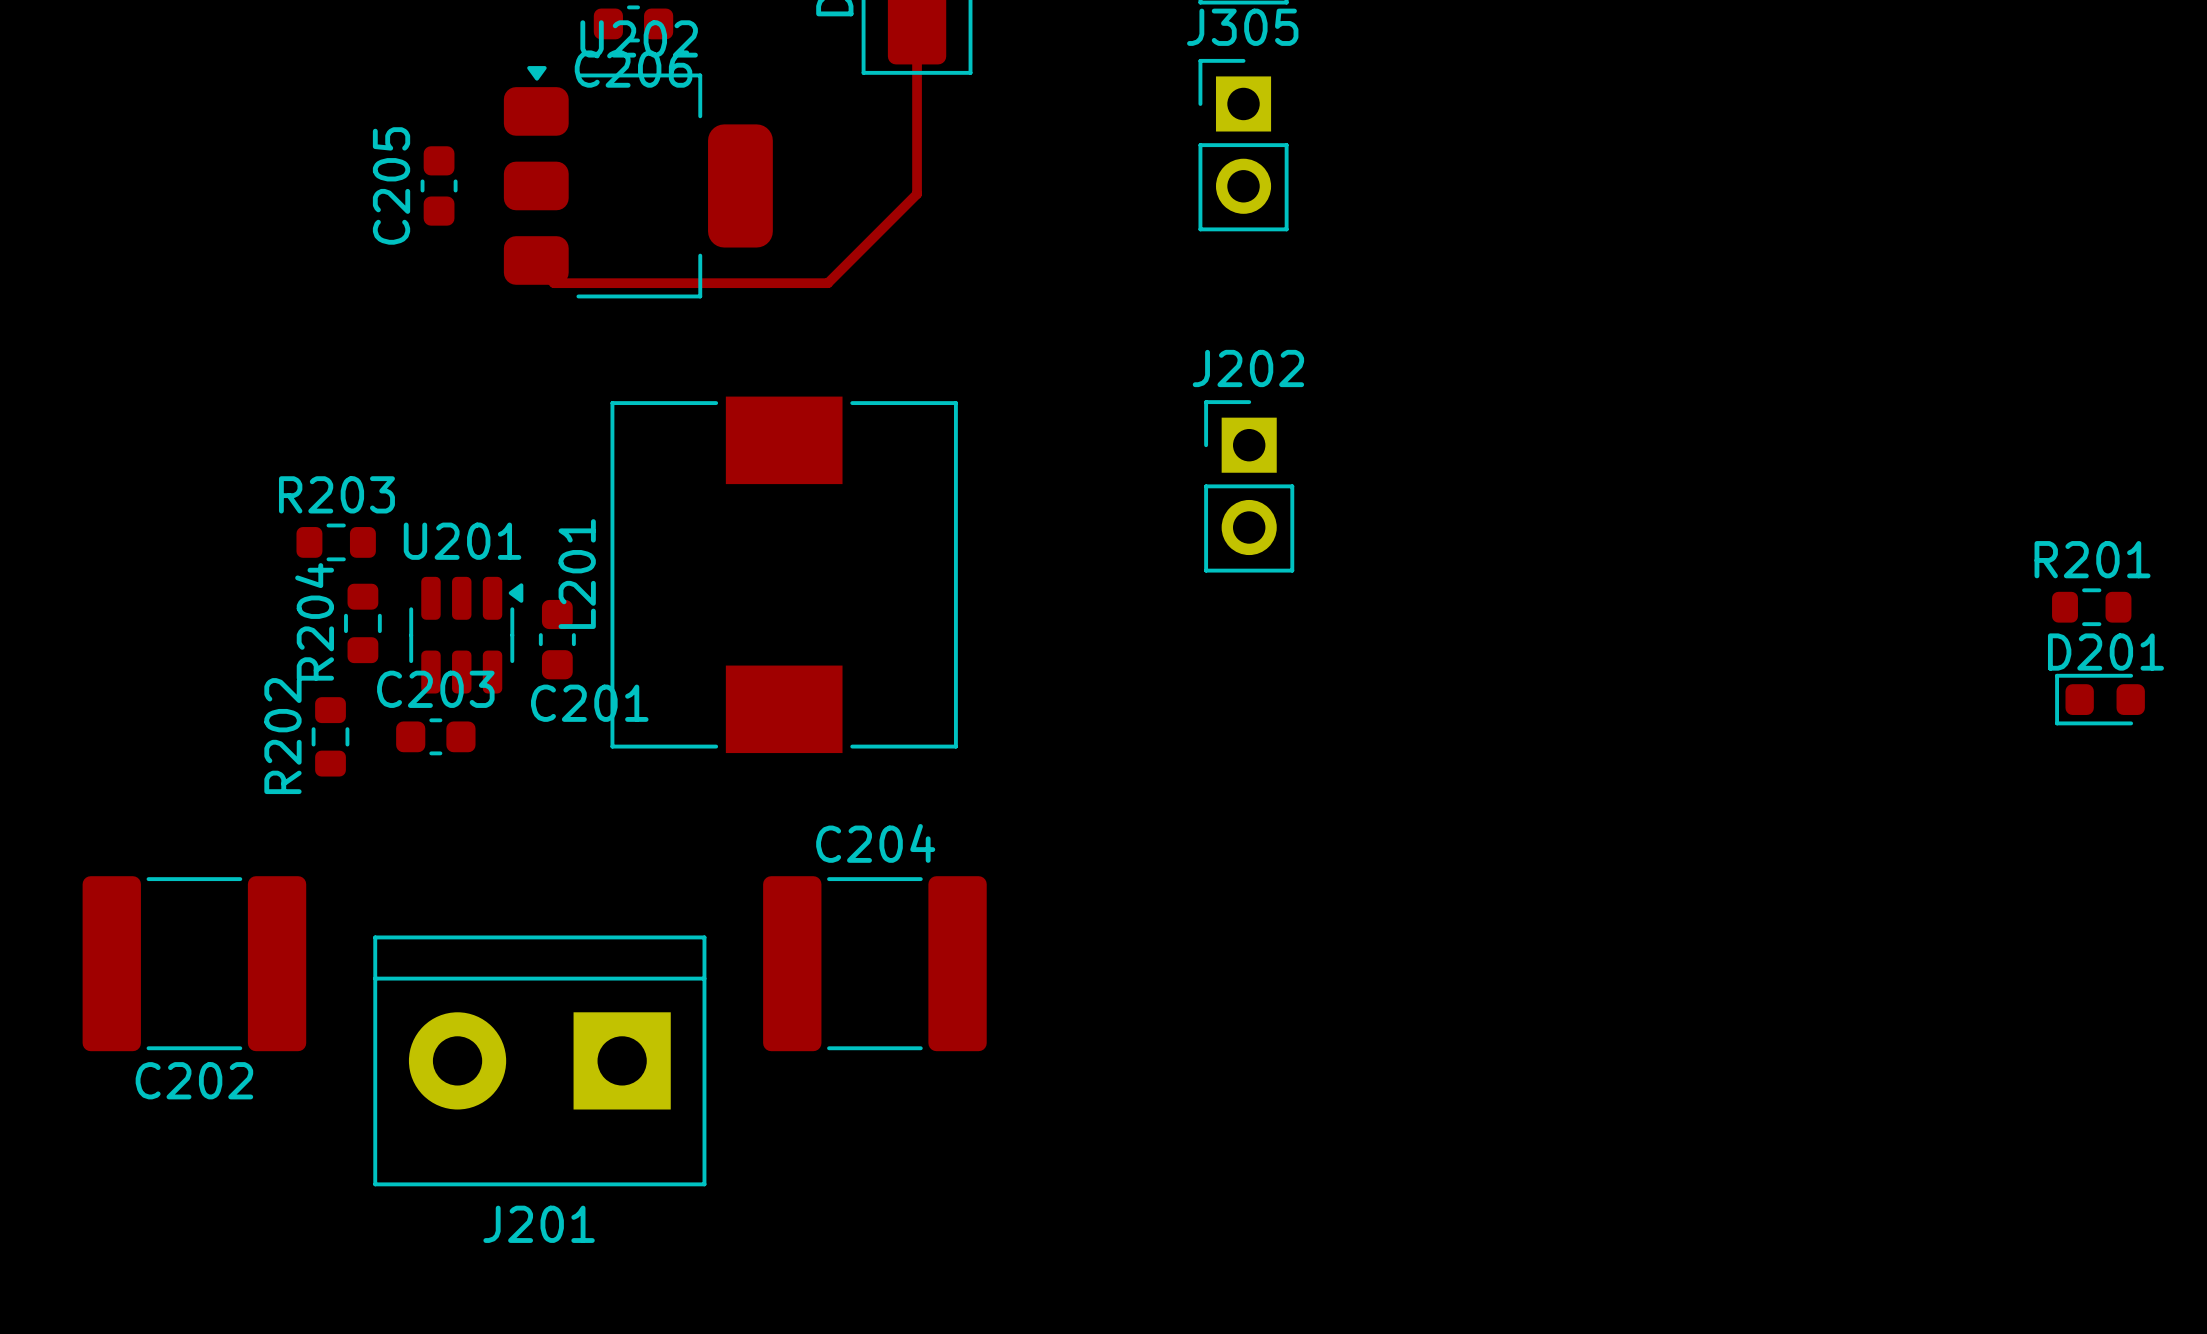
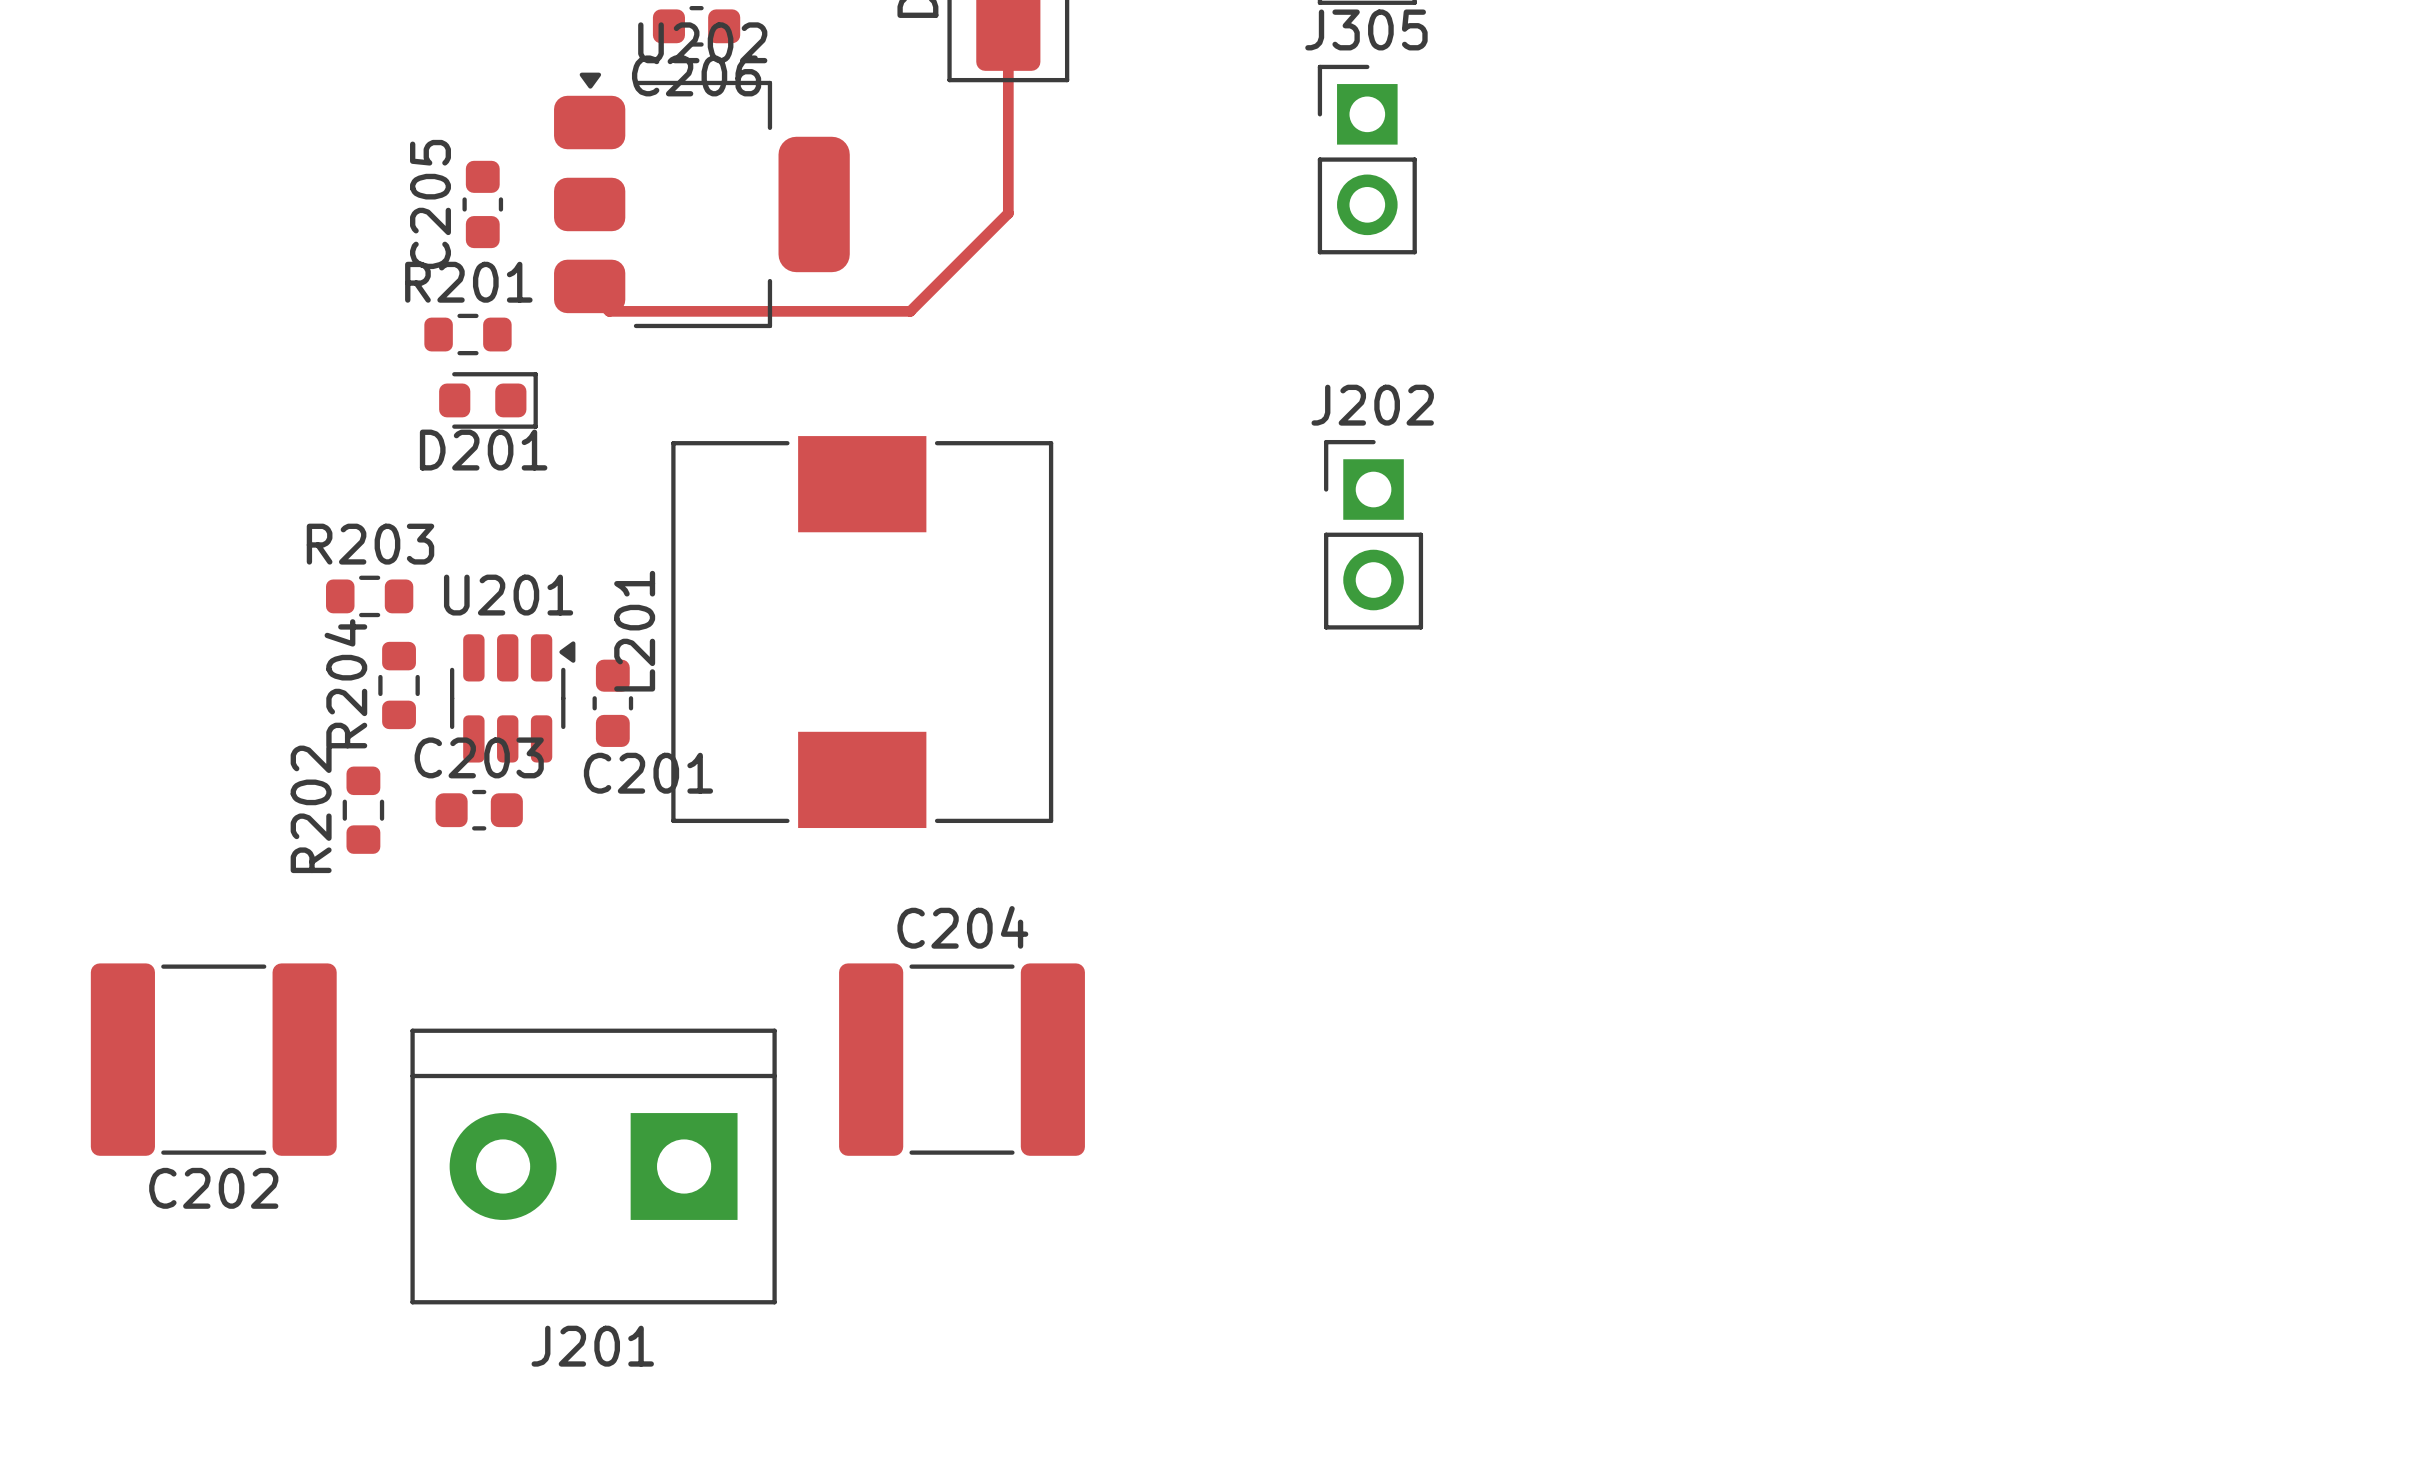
R201 position: (2091, 607) -> (467, 334)
D201 rotation: 0° (2100, 699) -> 180° (488, 400)
D201 position: (2100, 699) -> (488, 400)

